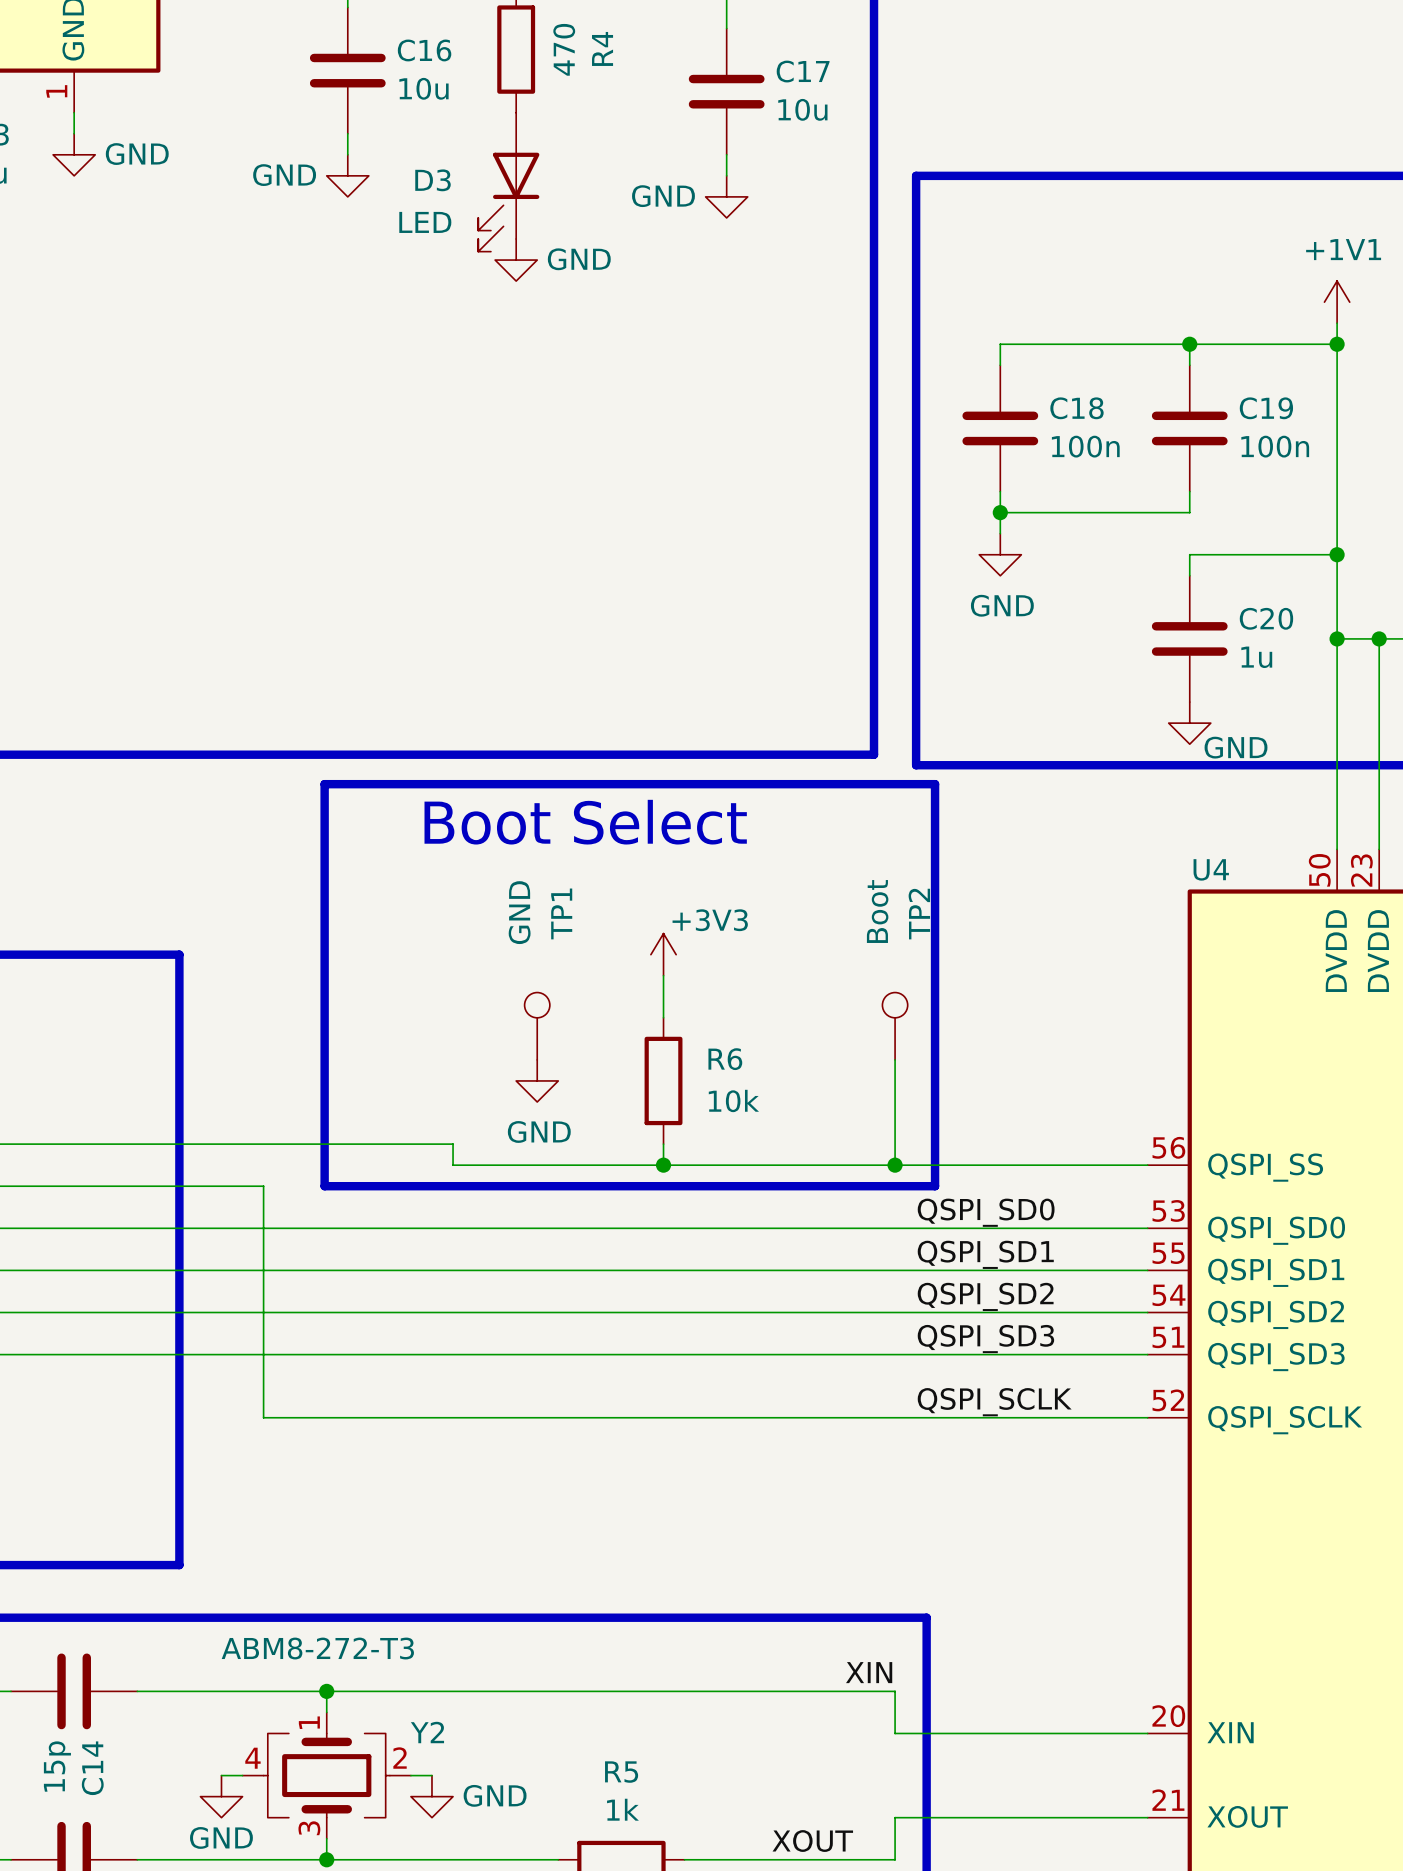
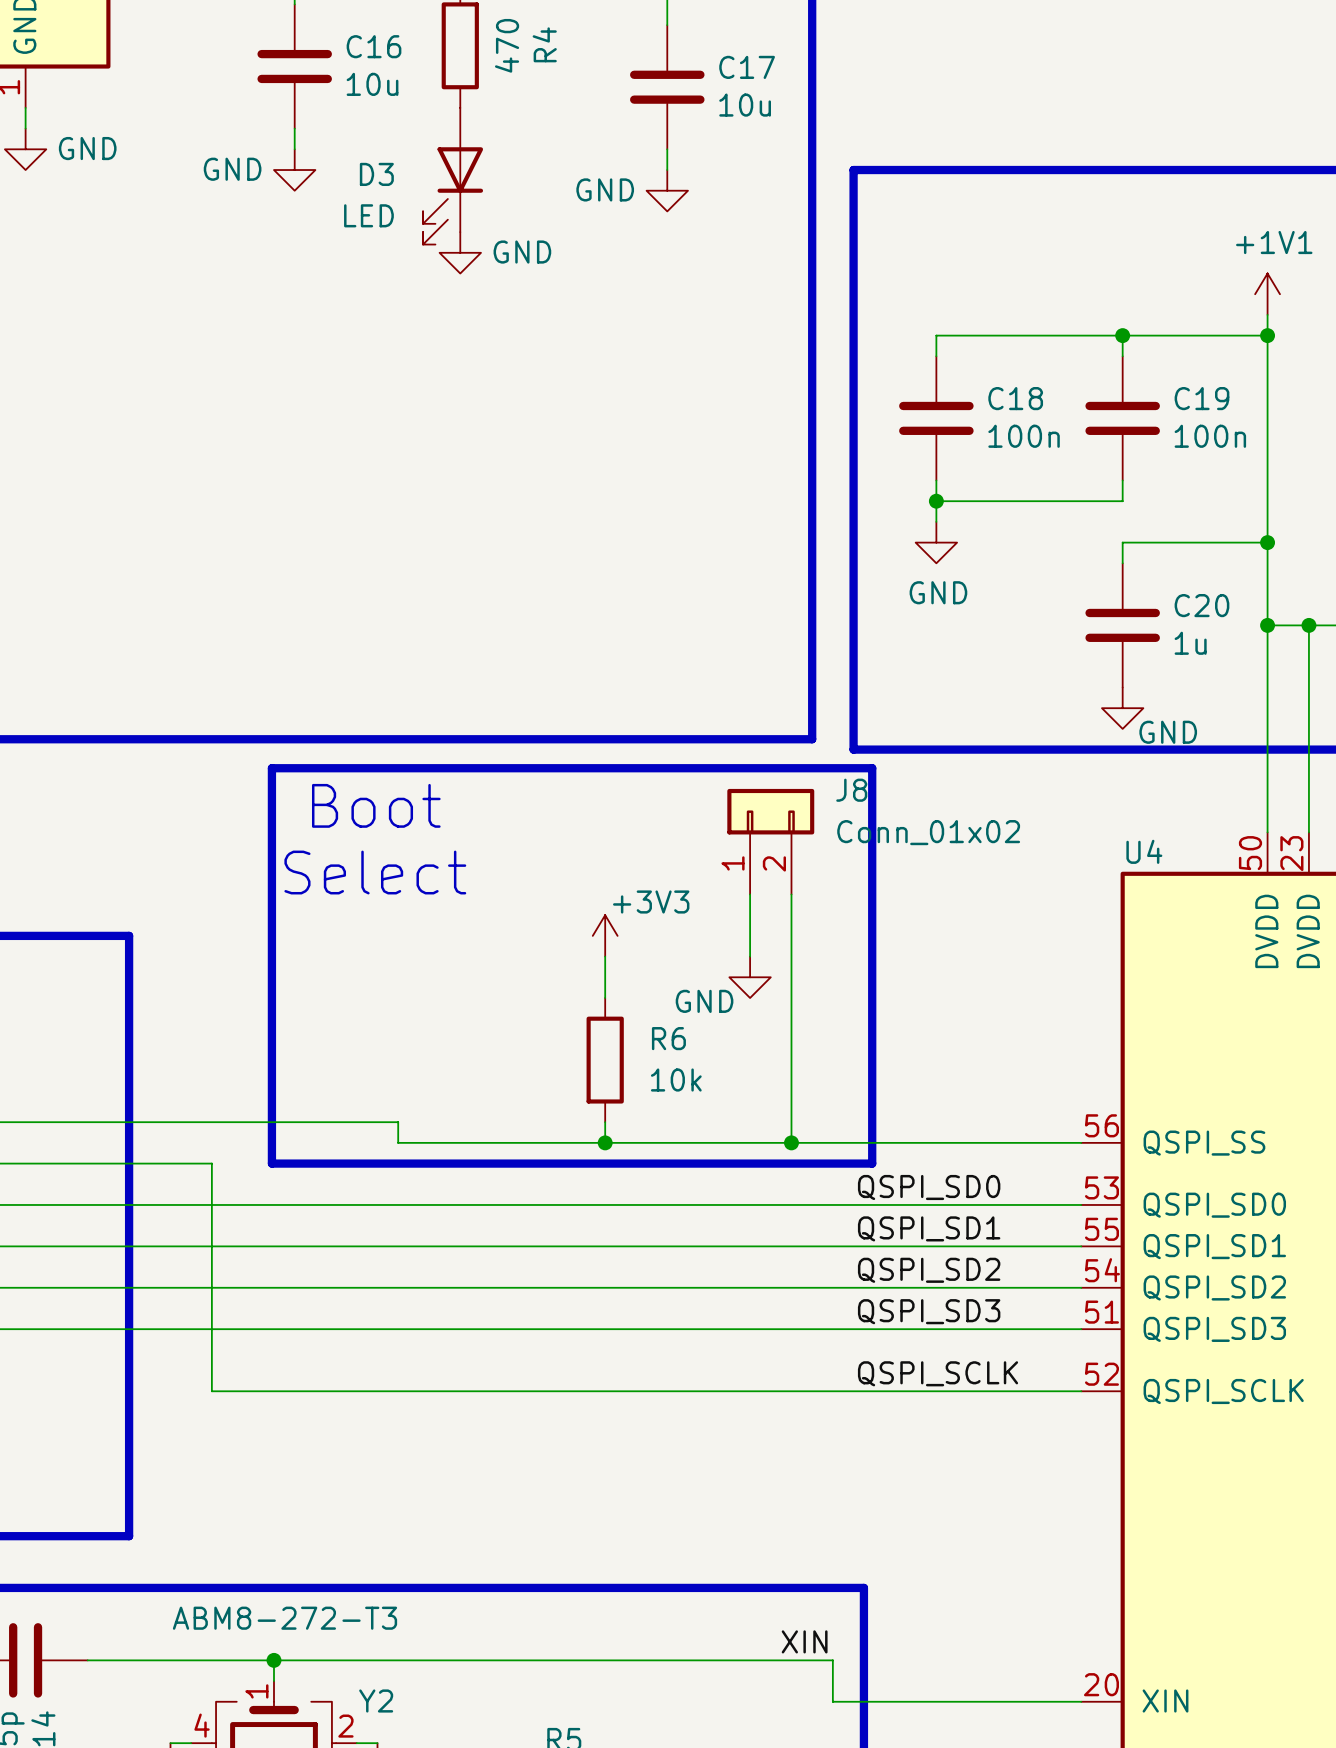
text: none -> Boot (376, 805)
text: Boot Select (585, 822) -> Select (375, 872)
J8: none -> Conn_01x02 (770, 841)
wire: none -> (750, 894) (750, 956)
wire: none -> (791, 894) (791, 1142)
TP1: GND (537, 1026) -> none
TP2: Boot (895, 1026) -> none
wire: (895, 1059) (895, 1165) -> none
power symbol position: GND (537, 1080) -> GND (750, 977)
power symbol text position: GND (539, 1131) -> GND (704, 1001)
junction position: (895, 1165) -> (791, 1142)

